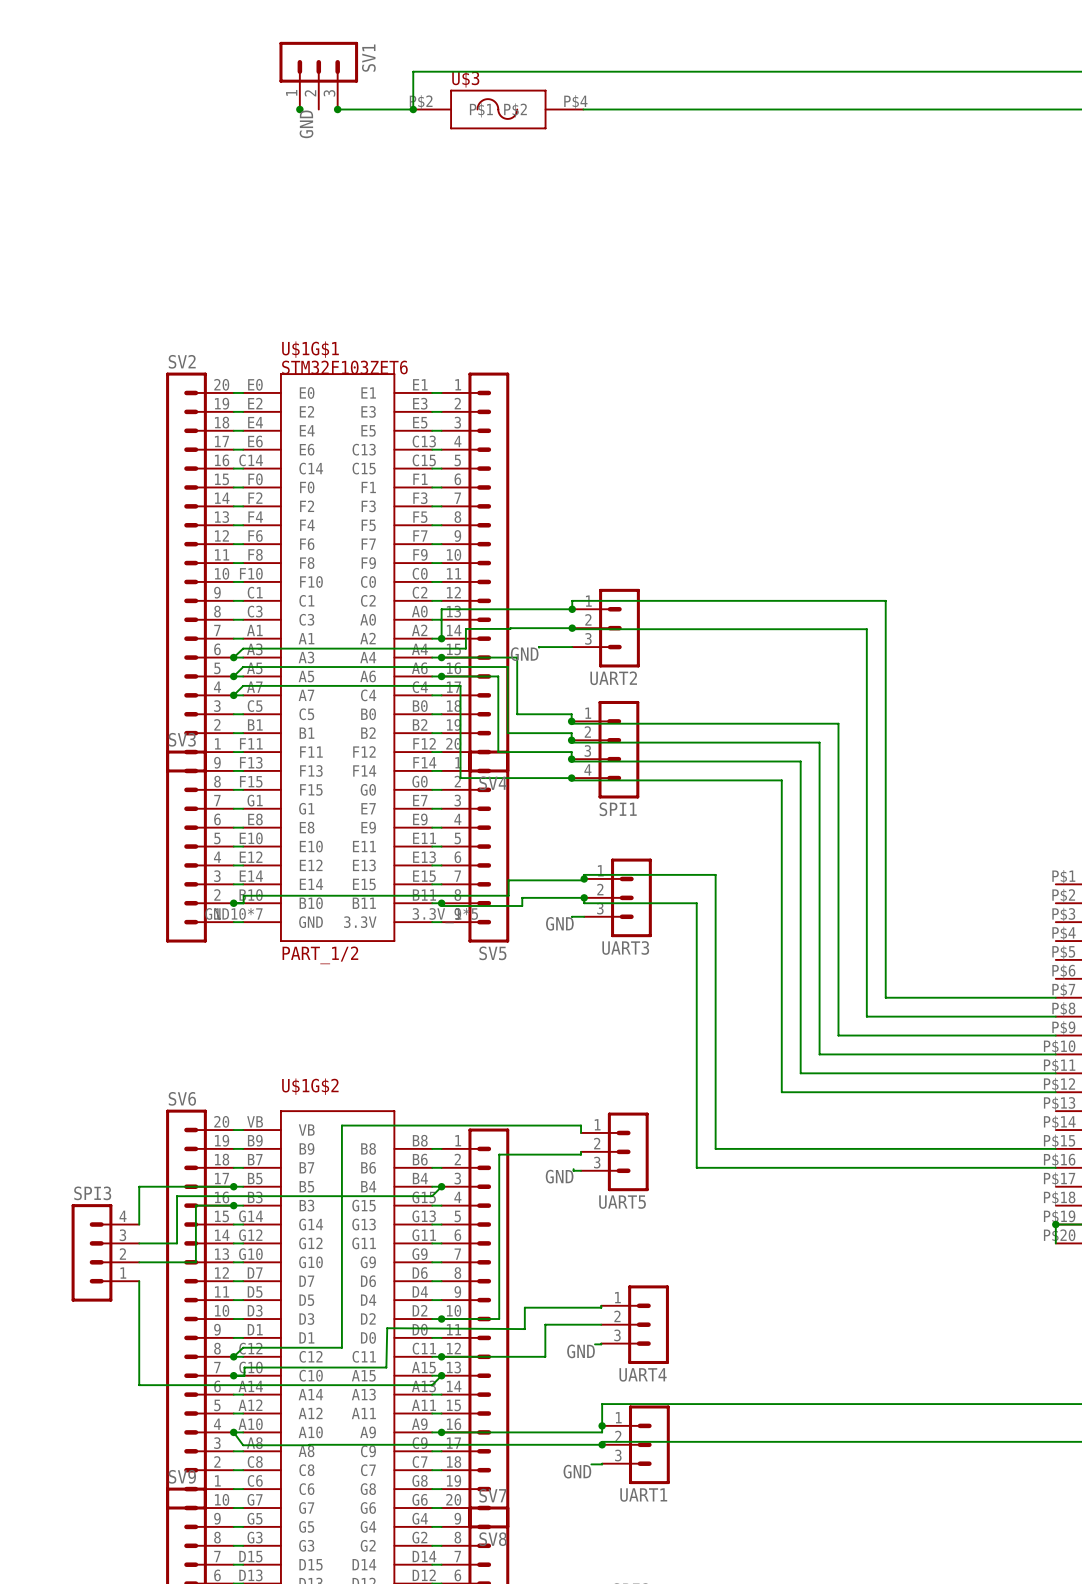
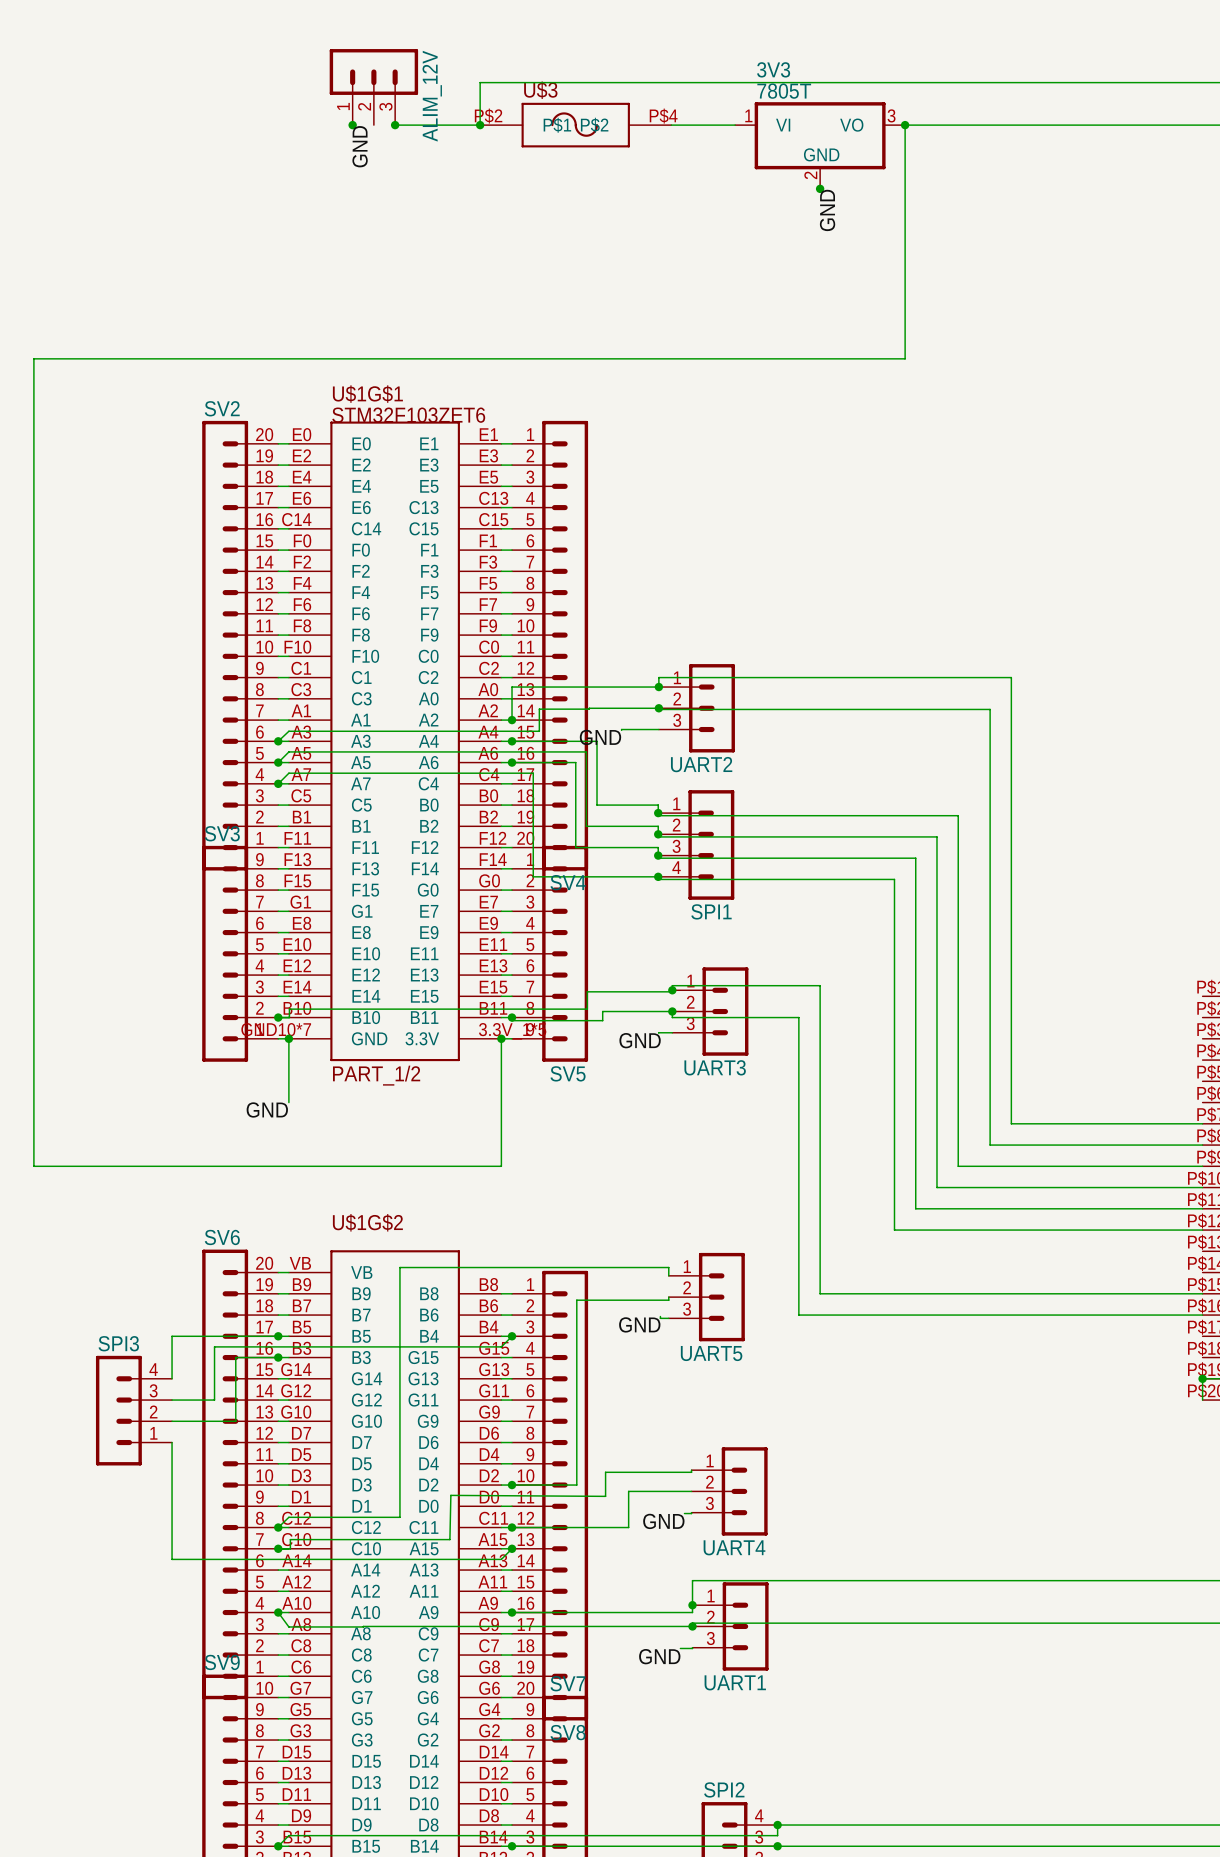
SV1 name: SV1 (368, 58) -> ALIM_12V (432, 96)
wire: (640, 109) (791, 109) -> (501, 1038) (501, 1166) (33, 1166) (33, 358) (905, 358) (905, 125)
junction: none -> (905, 125)
3V3: none -> 7805T (820, 145)
junction: none -> (820, 188)
label: none -> GND (827, 210)
wire: none -> (288, 1038) (288, 1102)
junction: none -> (288, 1038)
junction: none -> (501, 1038)
label: none -> GND (267, 1109)

